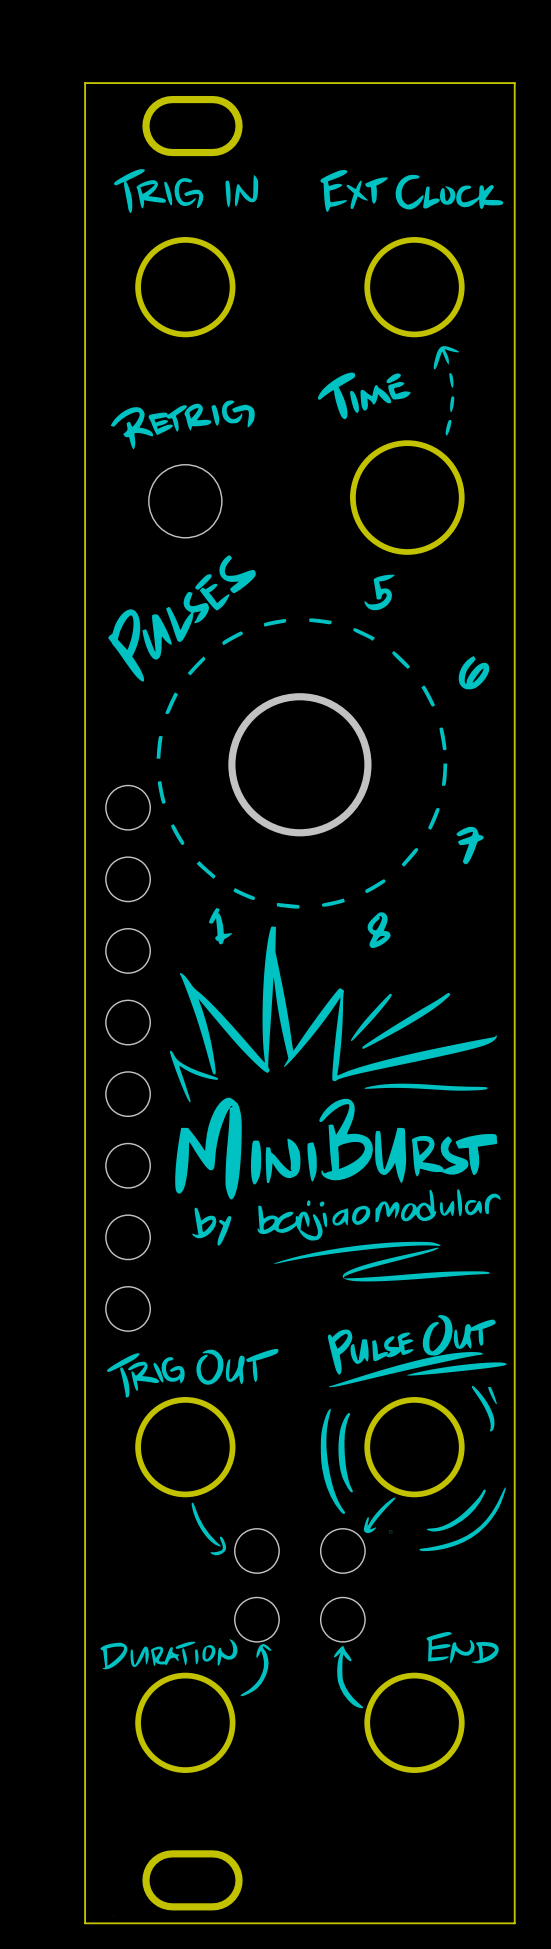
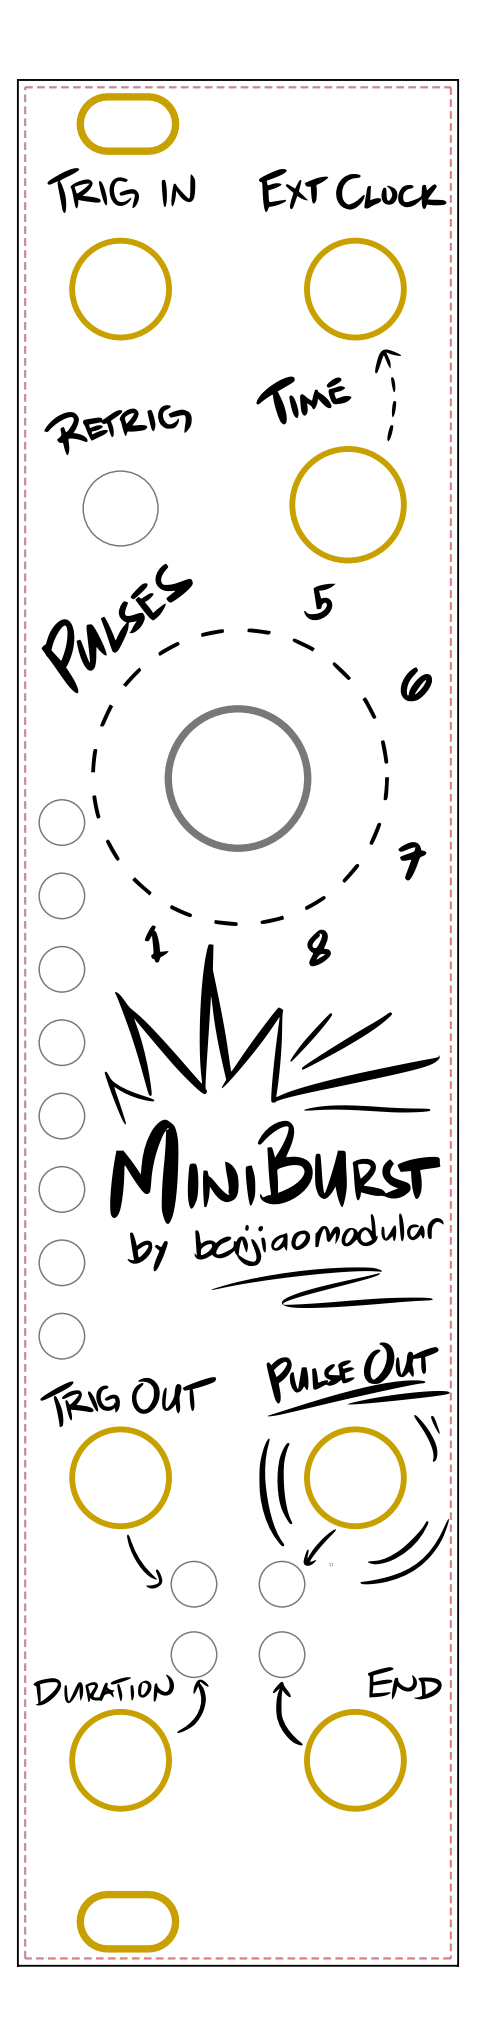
top zone outline: none -> (25, 87) (450, 87) (450, 1958) (25, 1958) (25, 87)

